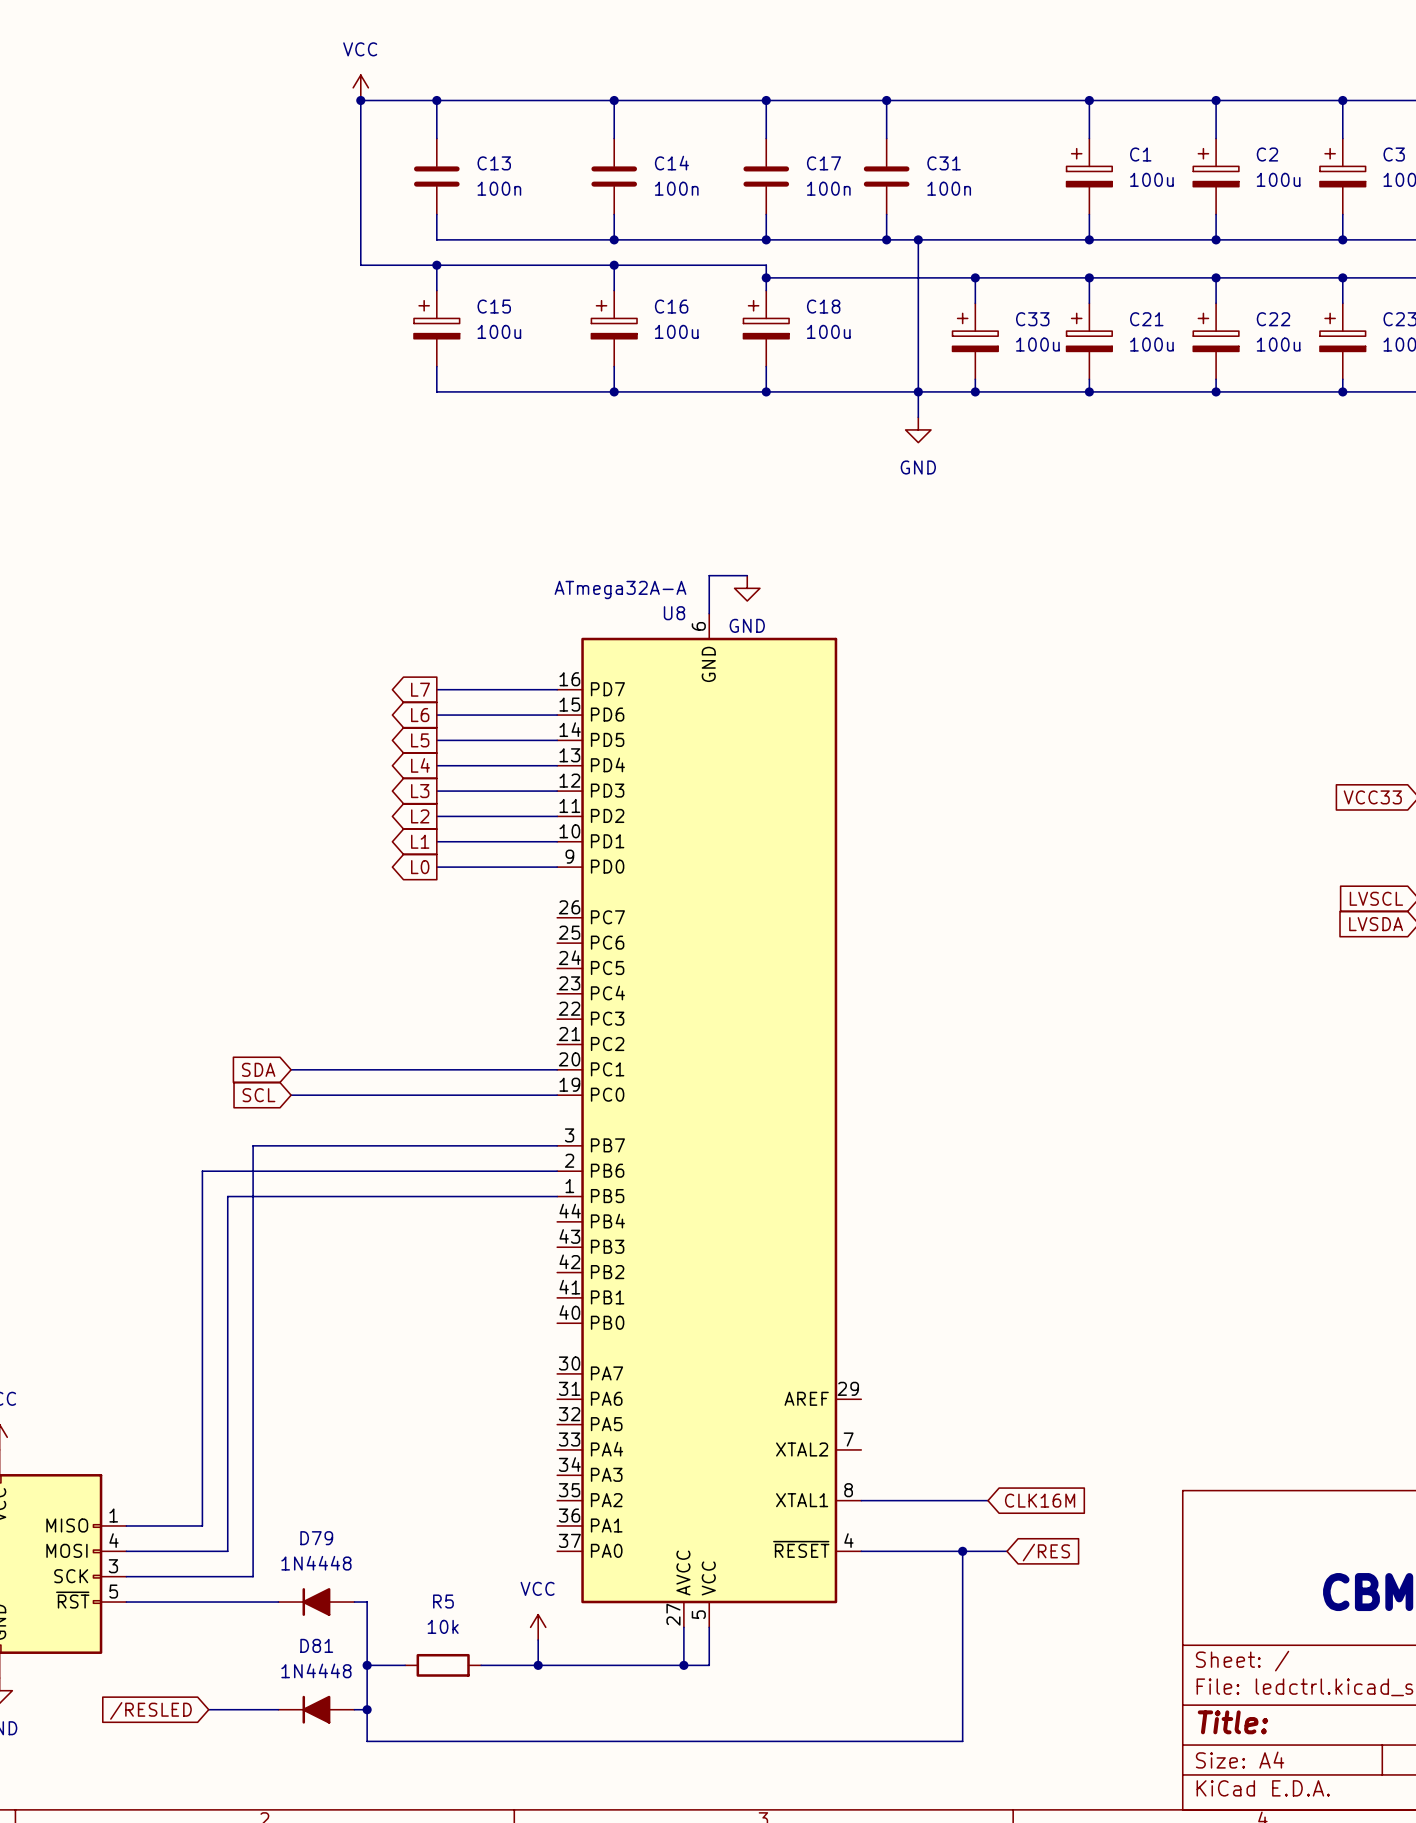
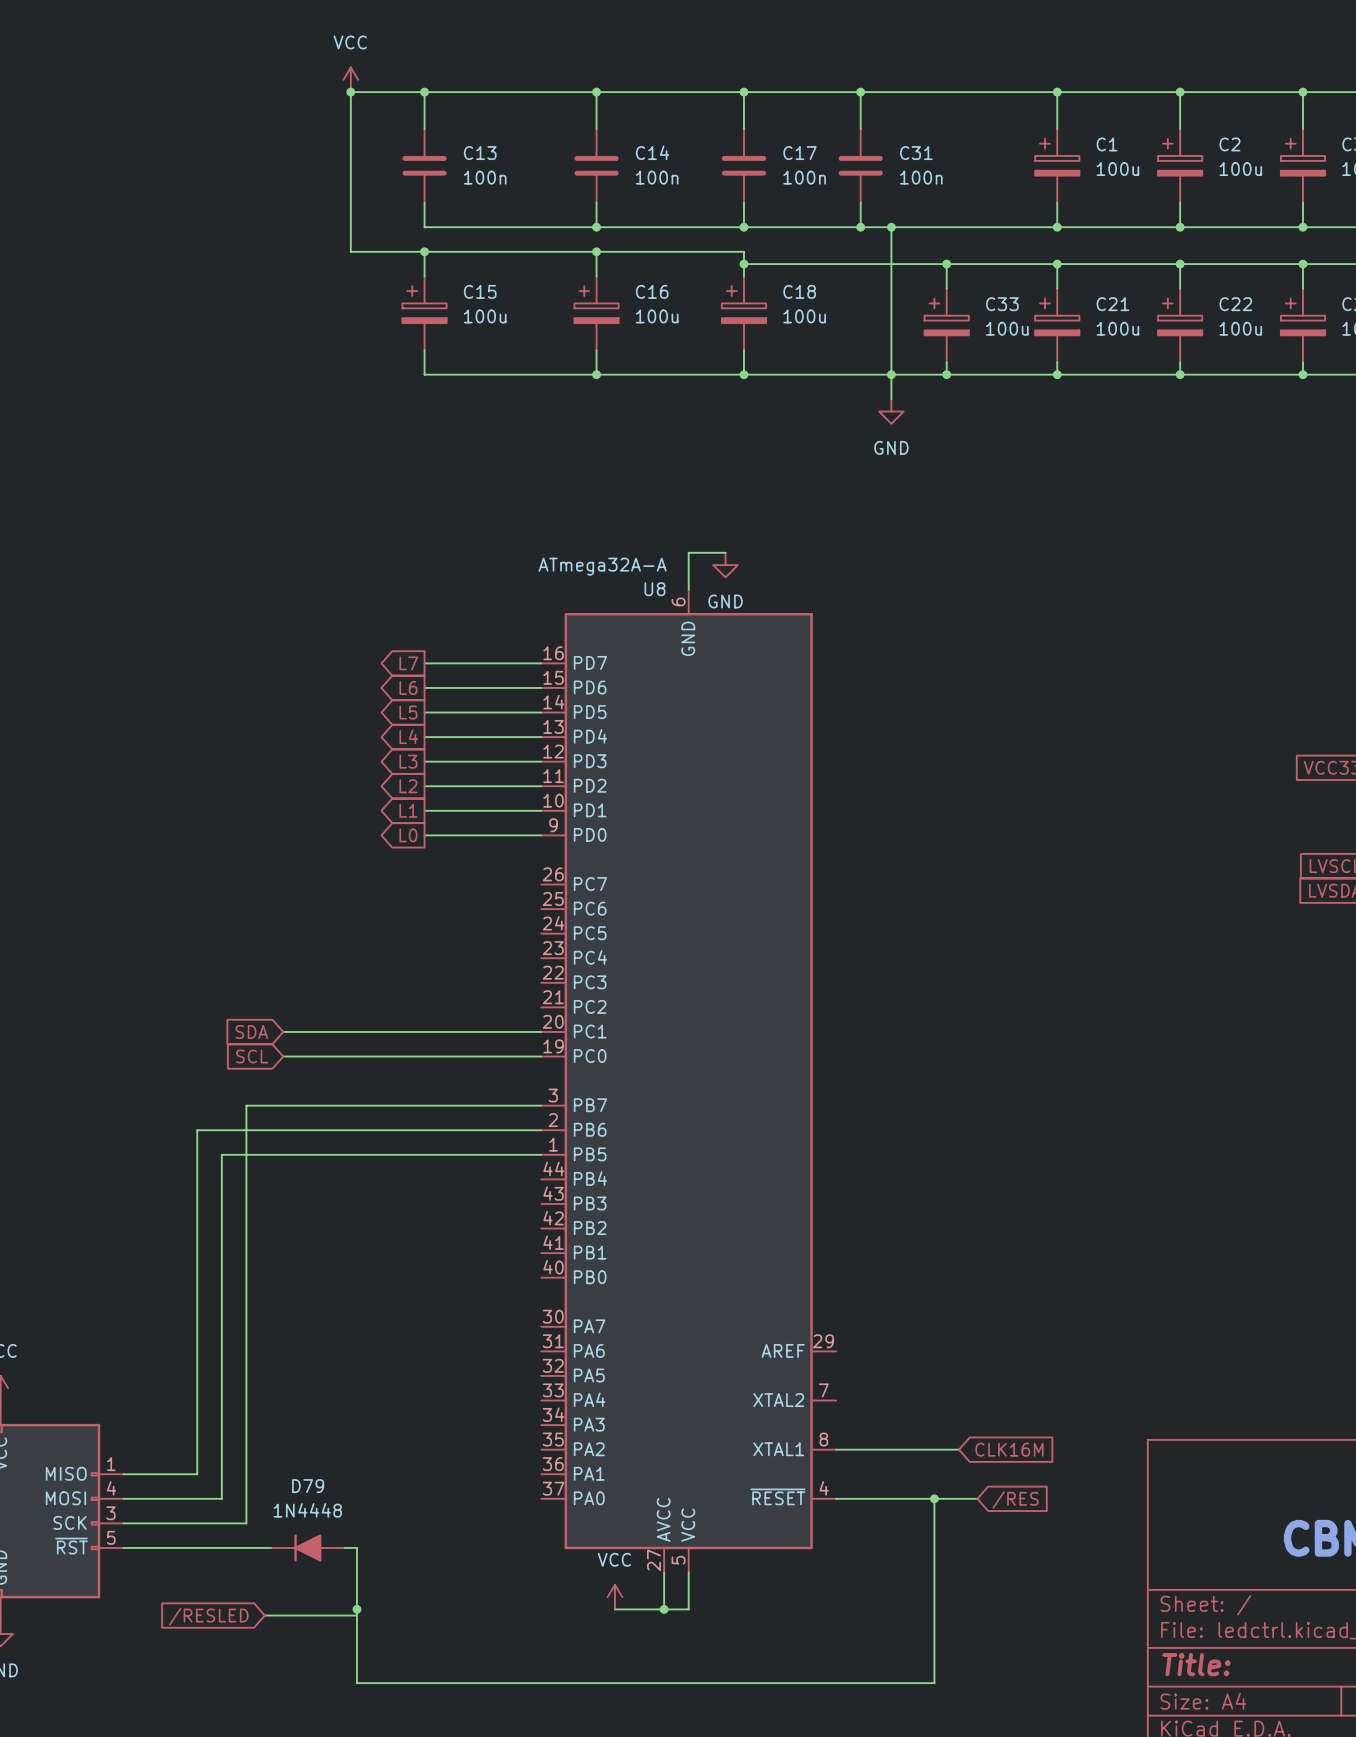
power symbol position: VCC (538, 1627) -> VCC (614, 1597)
wire: (538, 1640) (538, 1665) -> none
wire: (367, 1665) (405, 1665) -> none
R5: 10k (443, 1665) -> none
wire: (481, 1665) (633, 1665) -> none
junction: (538, 1665) -> none
wire: none -> (264, 1615) (356, 1615)
wire: (208, 1709) (278, 1709) -> none
D81: 1N4448 (316, 1709) -> none
wire: (354, 1709) (367, 1709) -> none
junction: (367, 1709) -> none
global label position: /RESLED (150, 1710) -> /RESLED (208, 1616)

